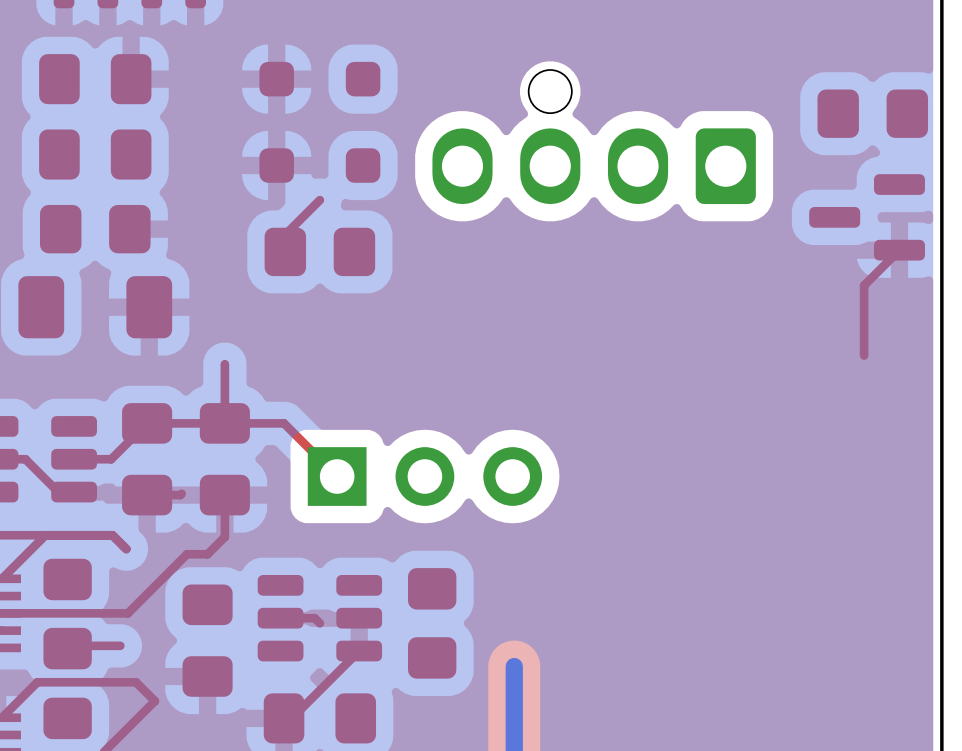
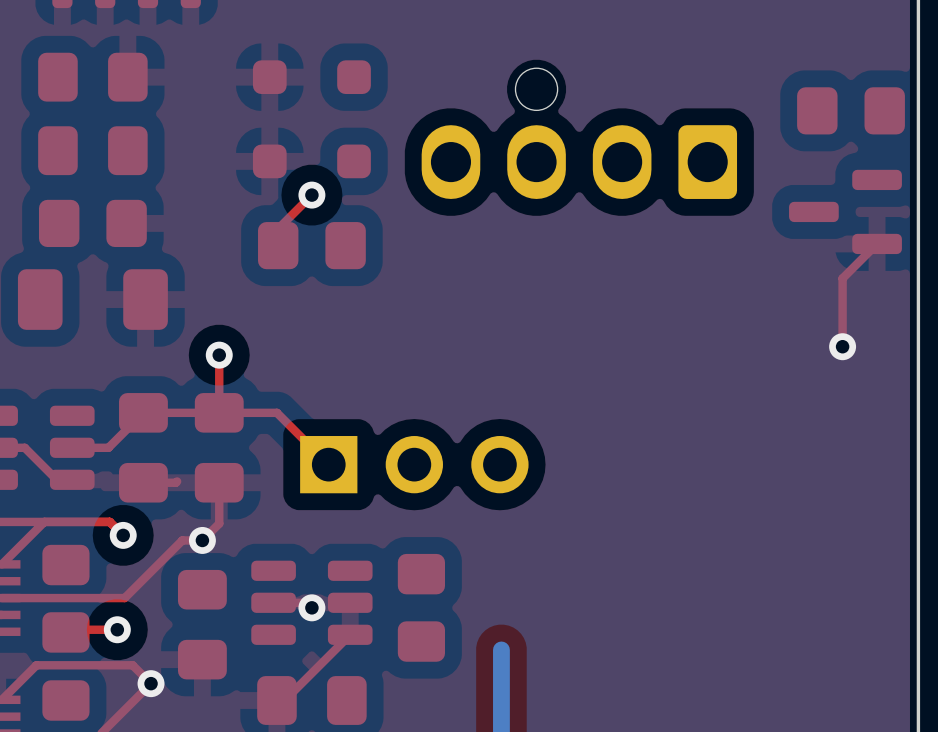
via: none -> (311, 195)
via: none -> (842, 346)
via: none -> (219, 355)
via: none -> (123, 535)
via: none -> (202, 540)
via: none -> (311, 607)
via: none -> (117, 629)
via: none -> (151, 683)

